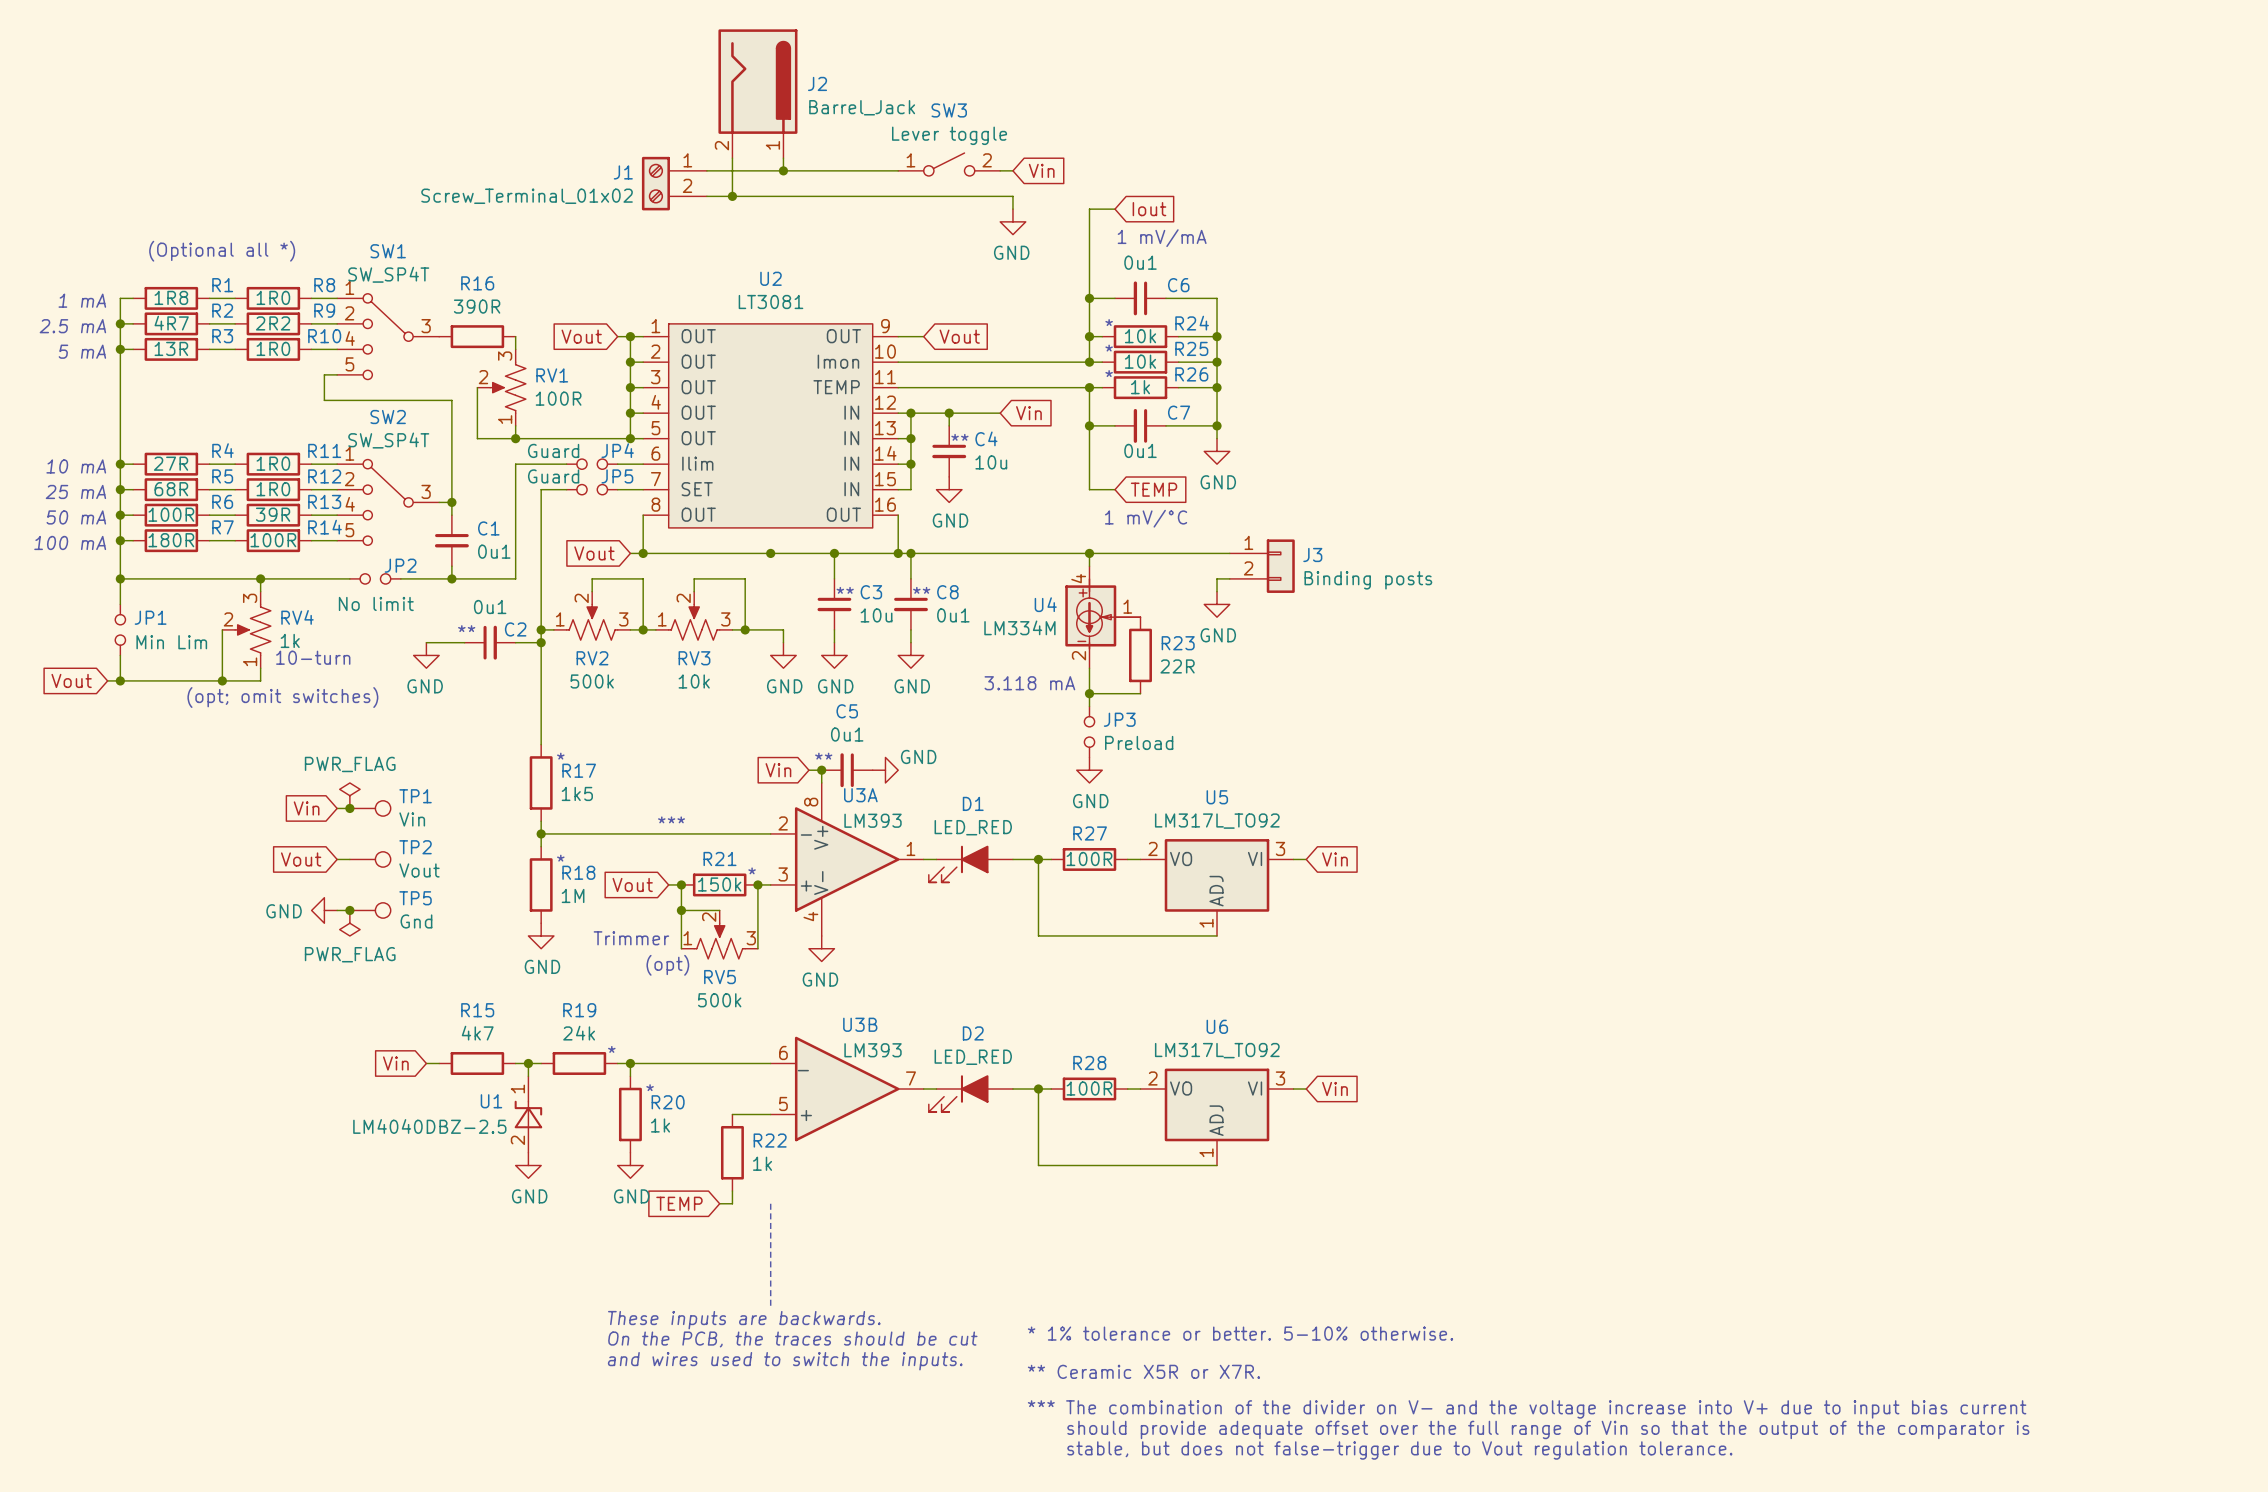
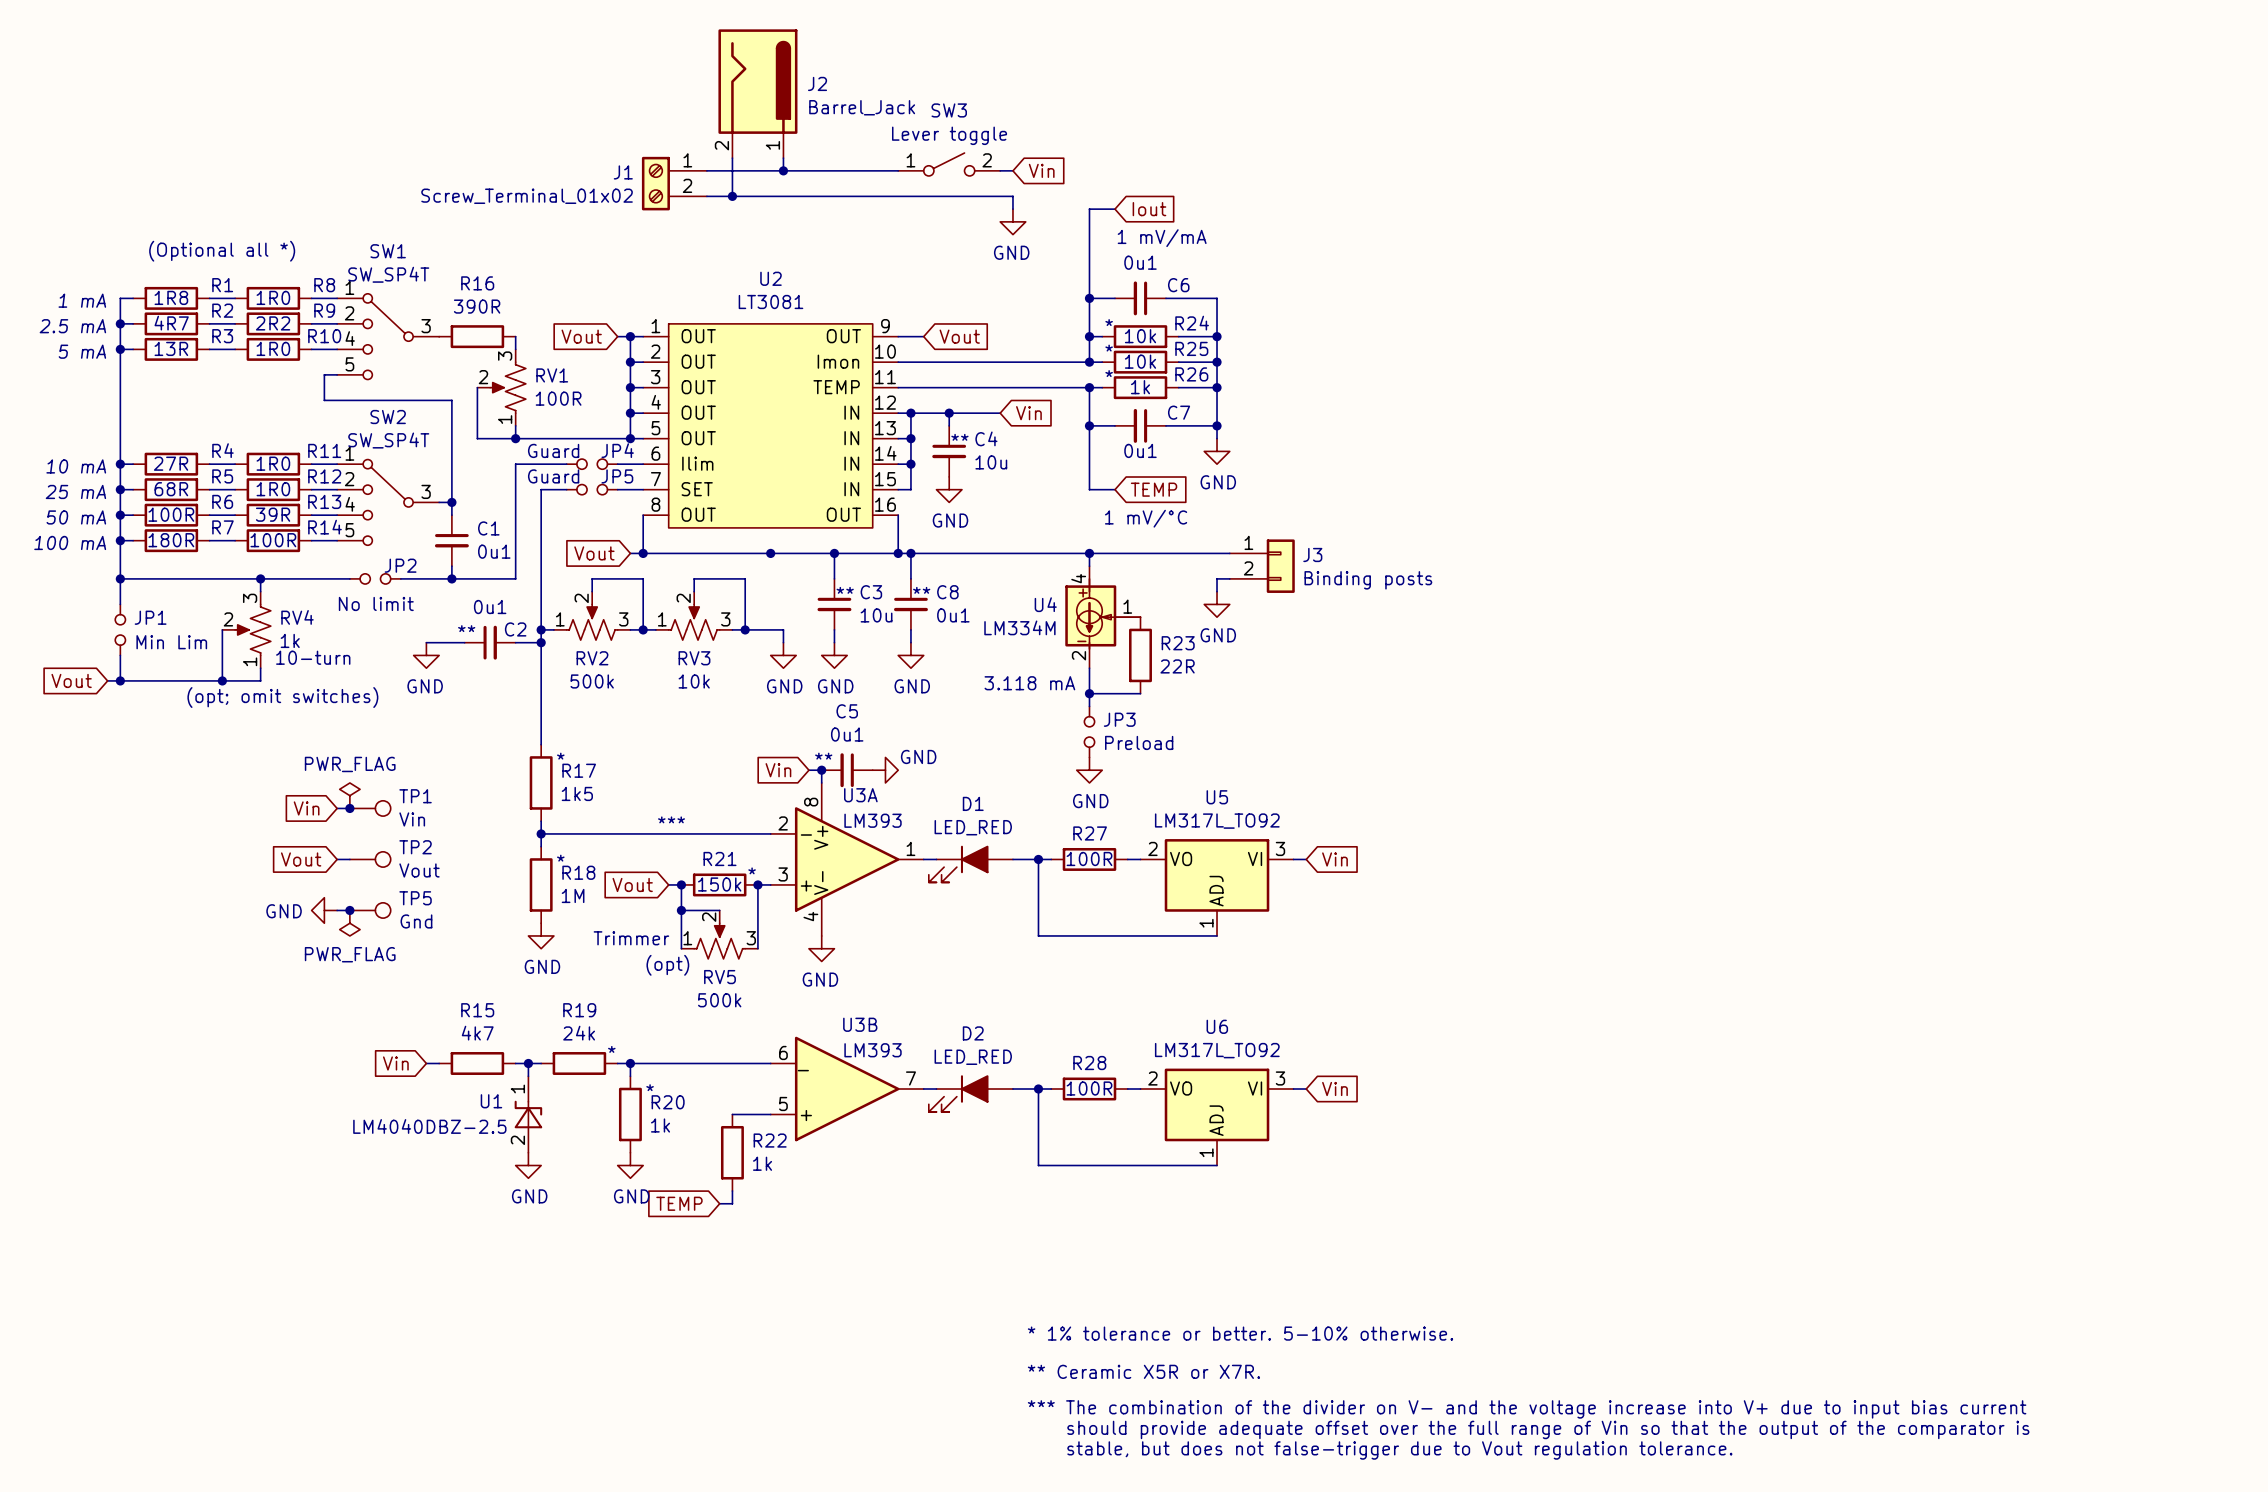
line: (770, 1203) (770, 1305) -> none
text: These inputs are backwards. (744, 1320) -> none
text: On the PCB, the traces should be cut (792, 1339) -> none
text: and wires used to switch the inputs. (785, 1361) -> none

